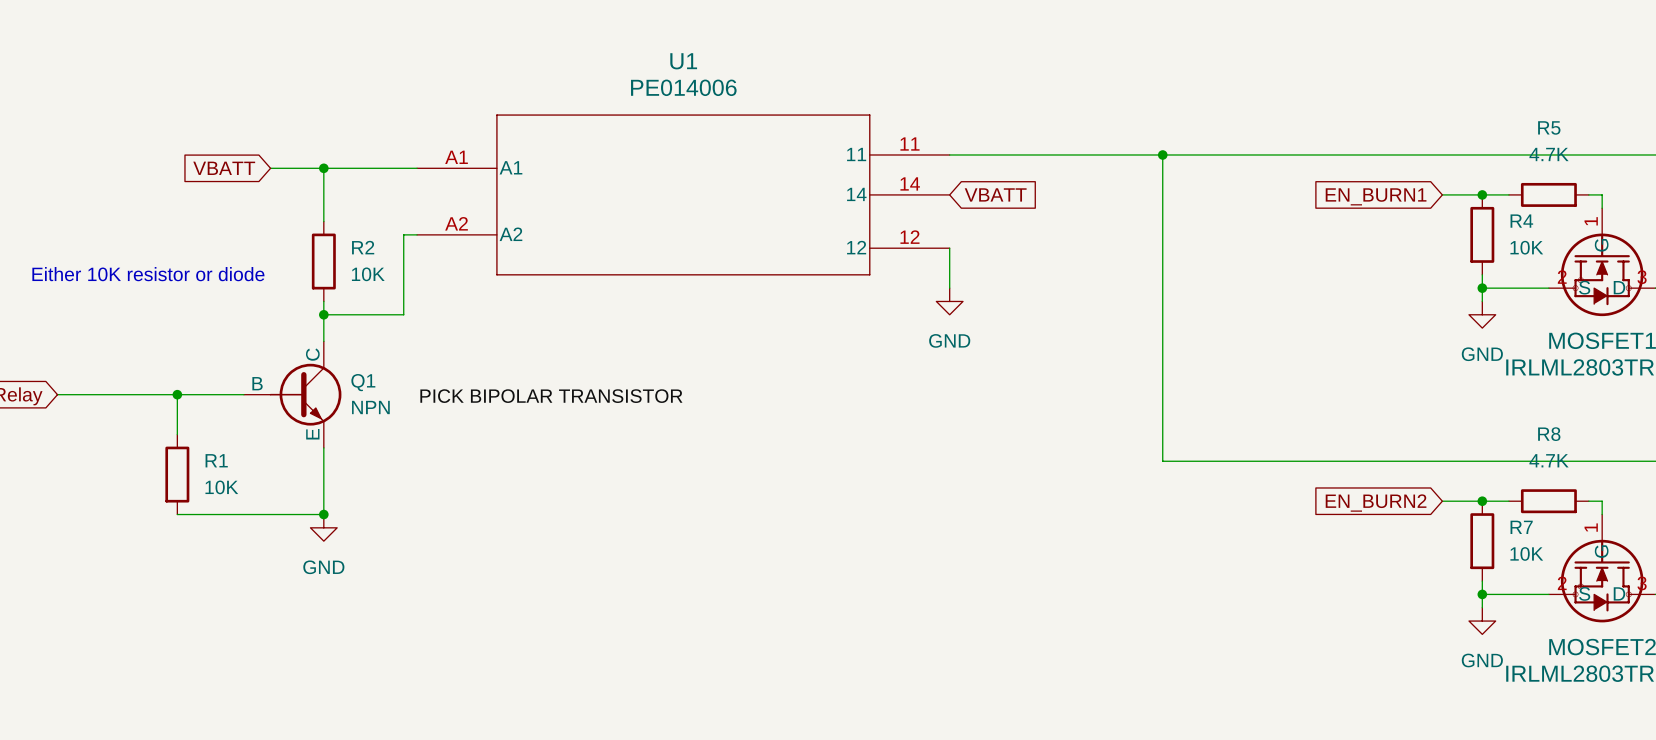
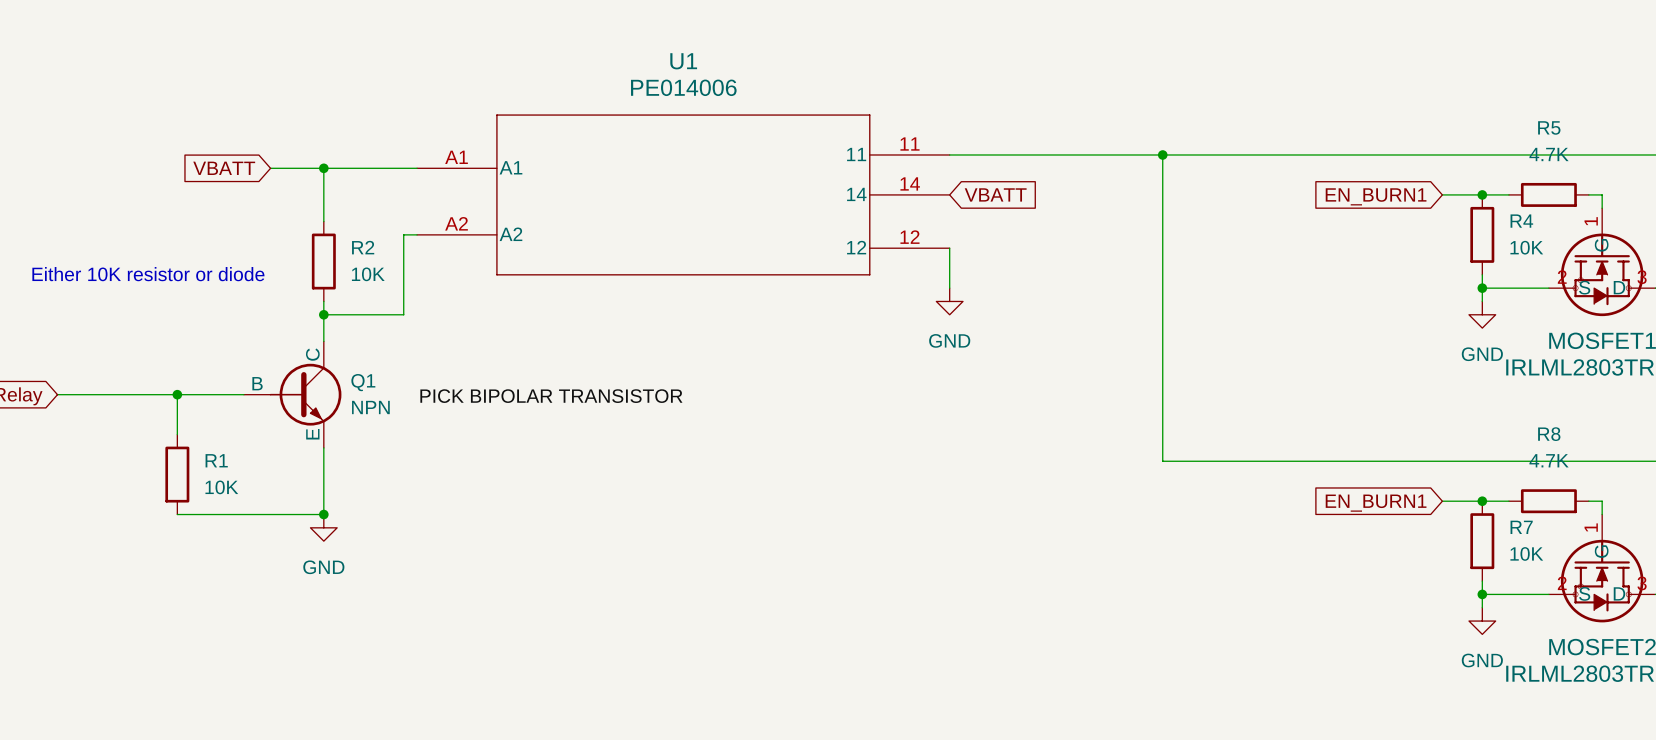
global label: EN_BURN2 (1376, 503) -> EN_BURN1 (1376, 503)

